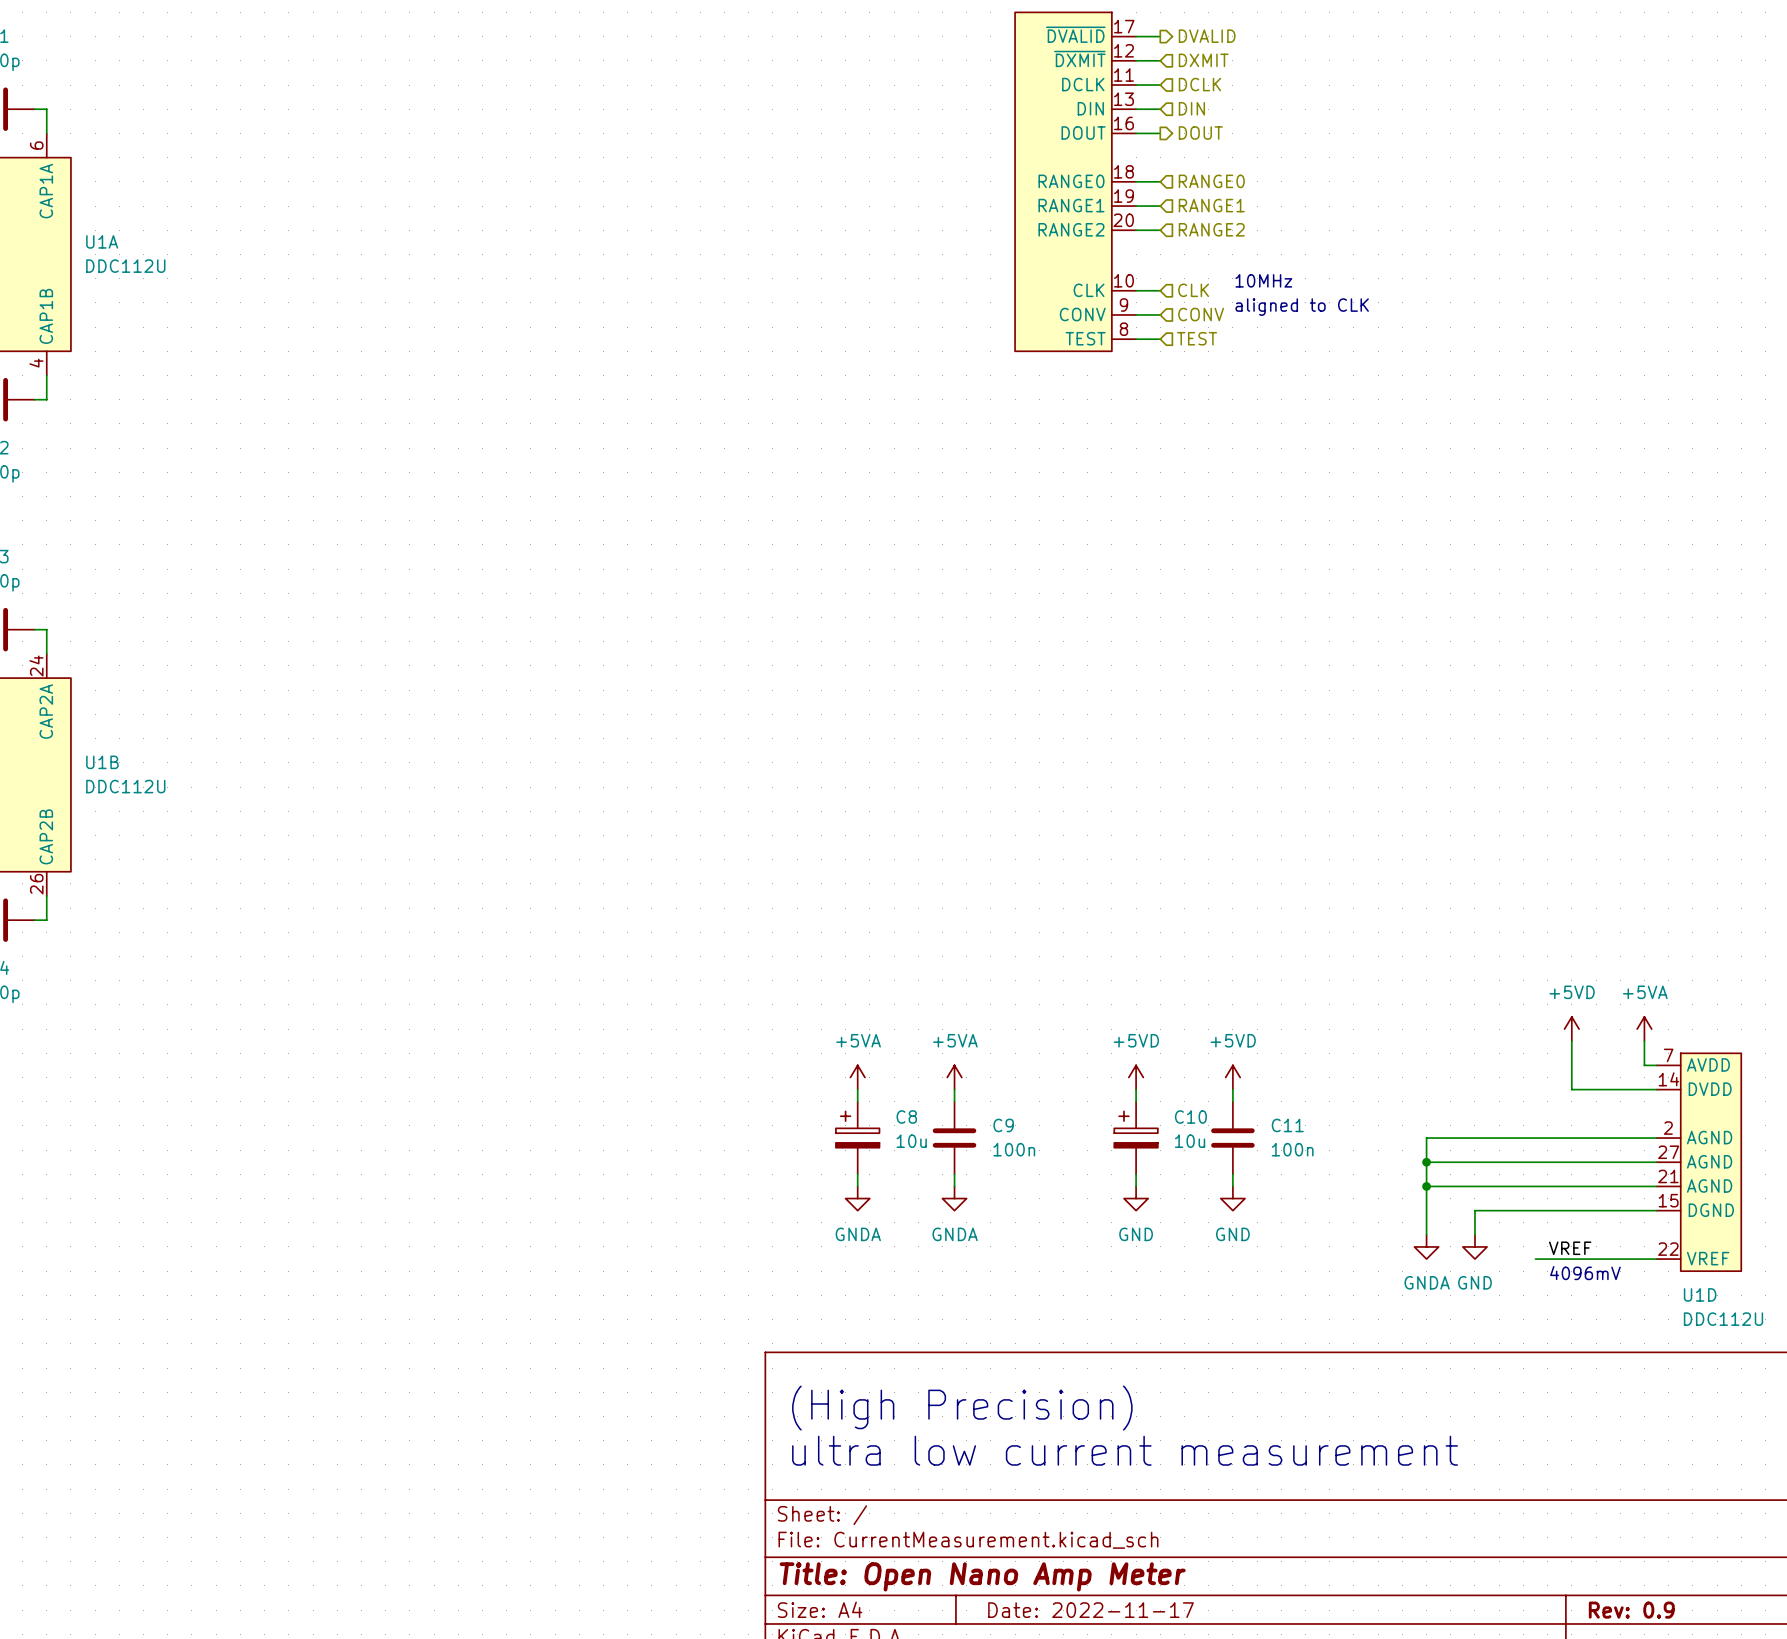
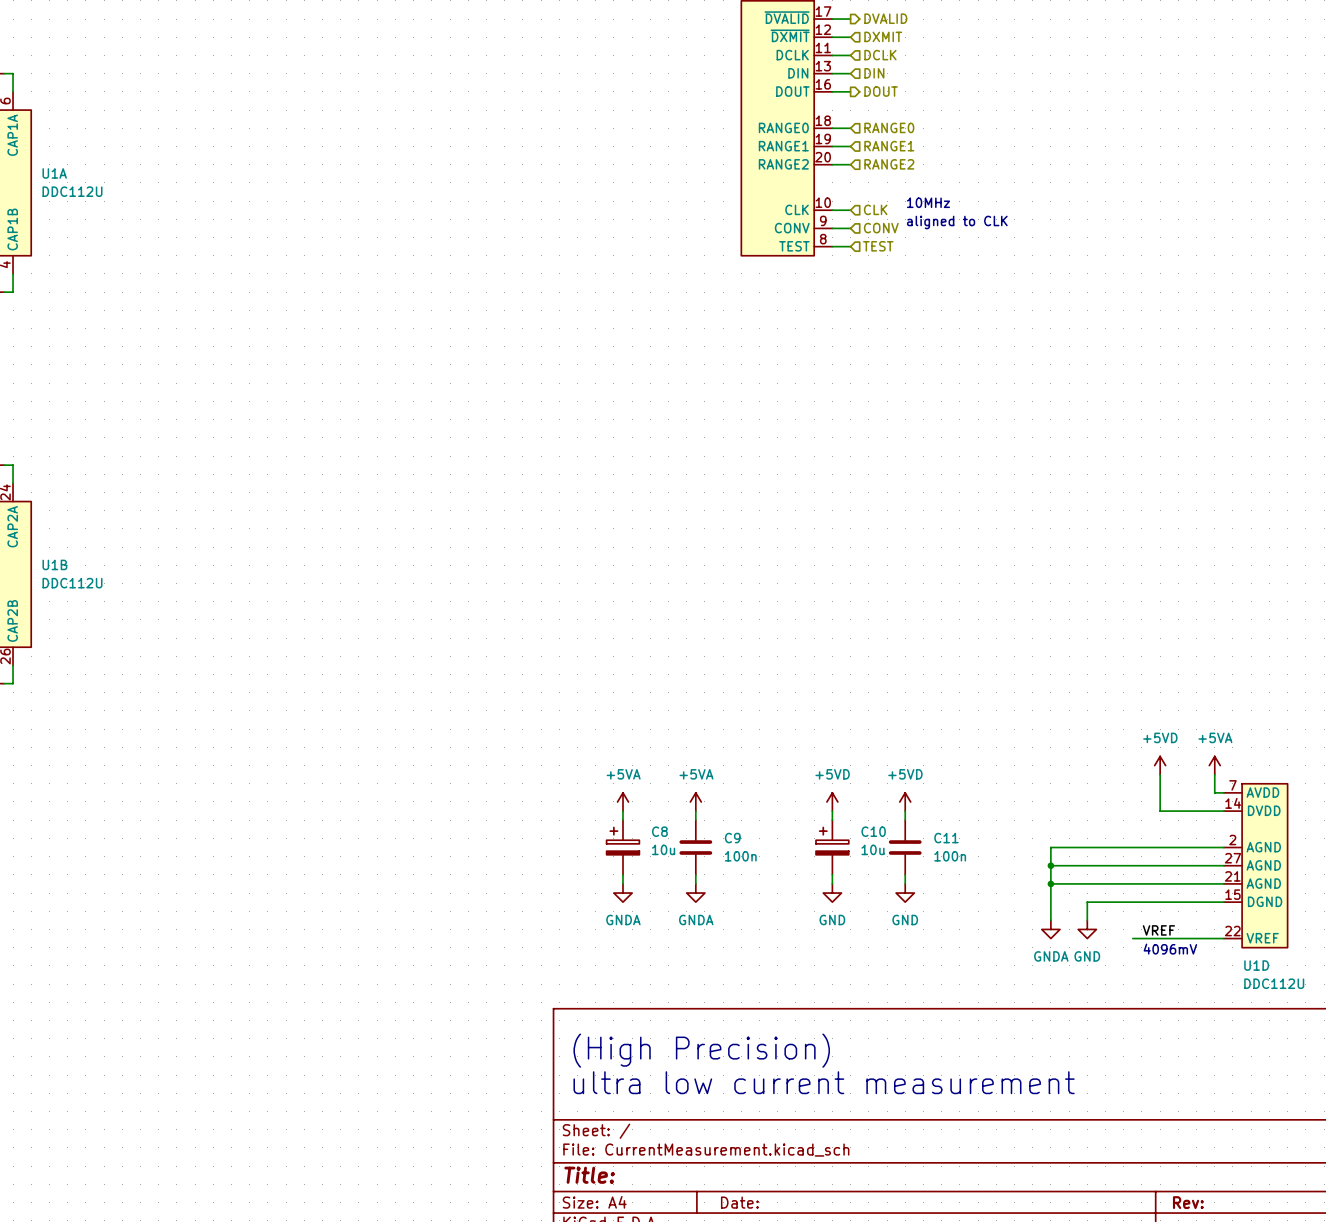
title block: Title: Open Nano Amp Meter (982, 1576) -> Title: (589, 1175)
title block: Date: 2022-11-17 (1091, 1610) -> Date: (739, 1202)
title block: Rev: 0.9 (1631, 1610) -> Rev: (1188, 1202)

